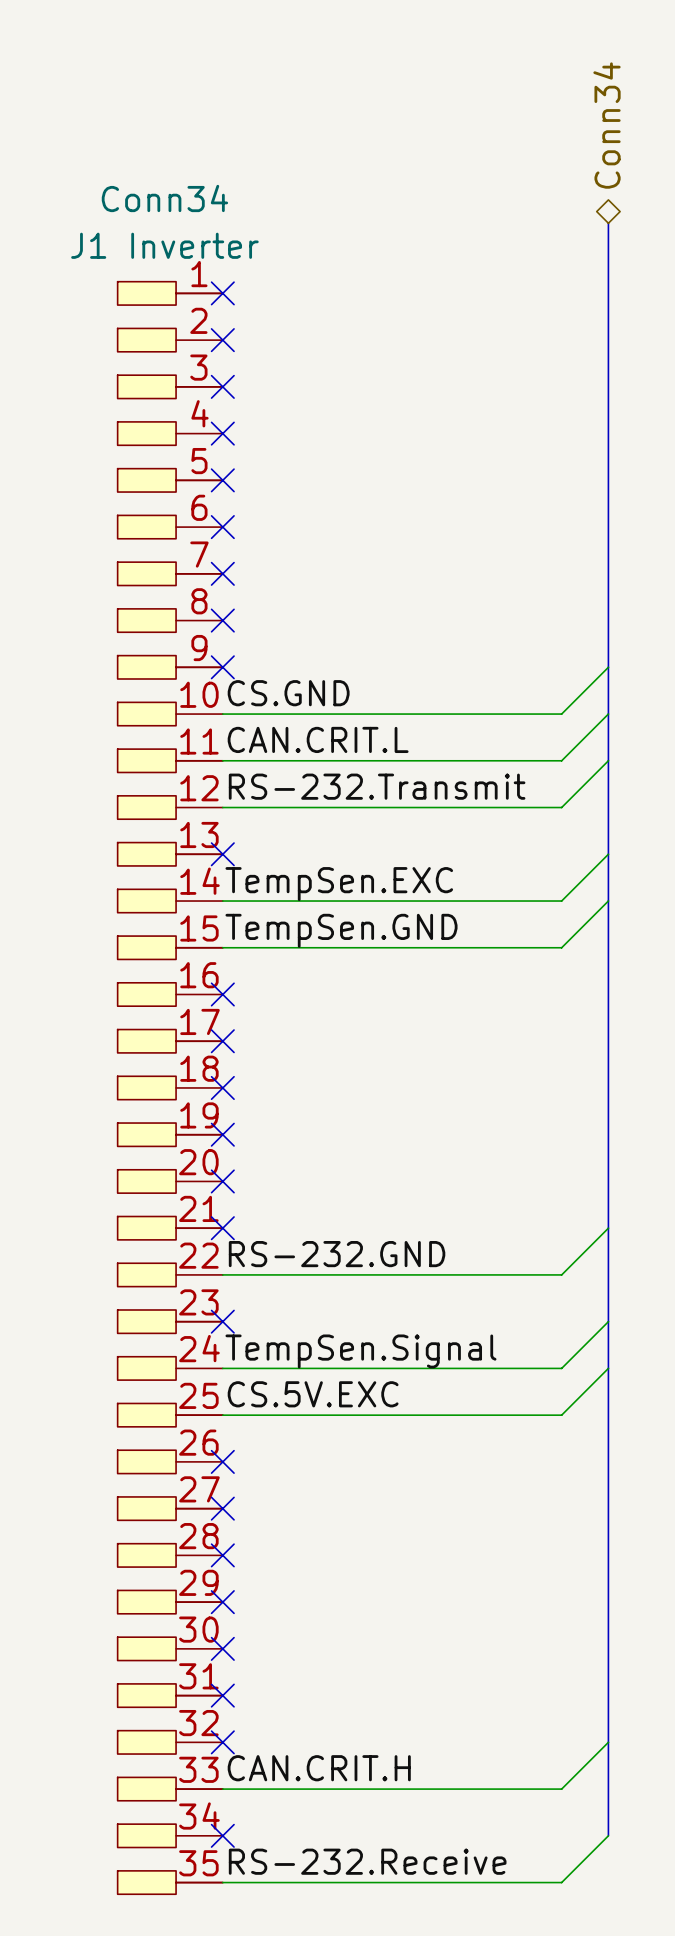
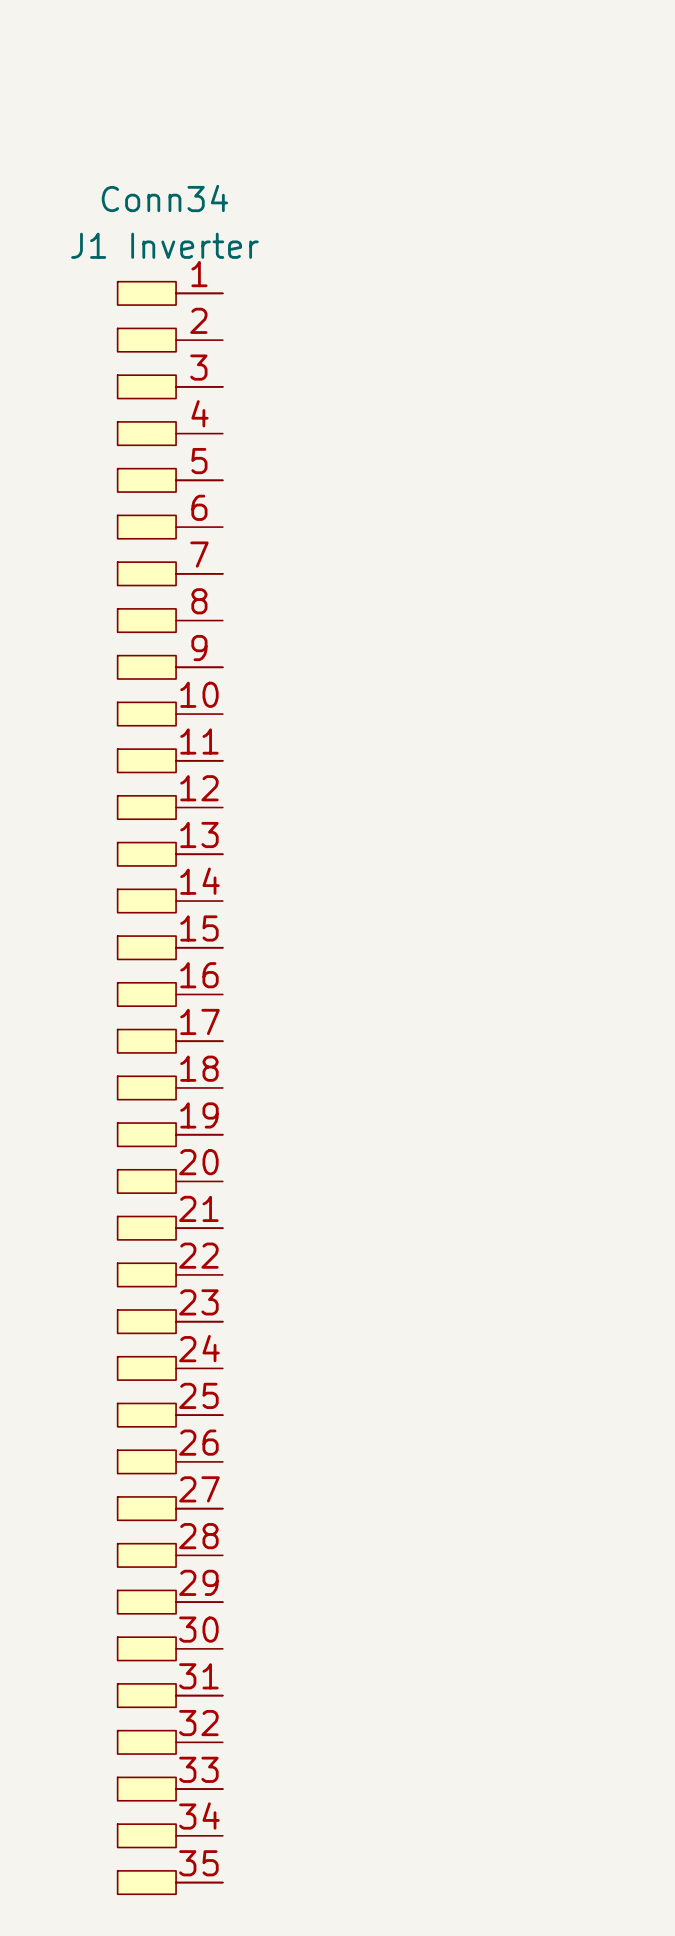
hierarchical label: Conn34 (606, 125) -> none
bus: (608, 223) (608, 1835) -> none
no-connect mark: (222, 293) -> none
no-connect mark: (222, 340) -> none
no-connect mark: (222, 386) -> none
no-connect mark: (222, 433) -> none
no-connect mark: (222, 480) -> none
no-connect mark: (222, 527) -> none
no-connect mark: (222, 573) -> none
no-connect mark: (222, 620) -> none
no-connect mark: (222, 667) -> none
wire: (608, 667) (561, 714) (222, 714) -> none
label: CS.GND (288, 693) -> none
wire: (608, 714) (561, 760) (222, 760) -> none
label: CAN.CRIT.L (318, 739) -> none
wire: (608, 760) (561, 807) (222, 807) -> none
label: RS-232.Transmit (377, 786) -> none
no-connect mark: (222, 854) -> none
wire: (608, 854) (561, 901) (222, 901) -> none
label: TempSen.EXC (339, 884) -> none
wire: (608, 901) (561, 947) (222, 947) -> none
label: TempSen.GND (341, 930) -> none
no-connect mark: (222, 994) -> none
no-connect mark: (222, 1041) -> none
no-connect mark: (222, 1087) -> none
no-connect mark: (222, 1134) -> none
no-connect mark: (222, 1181) -> none
no-connect mark: (222, 1228) -> none
wire: (608, 1228) (561, 1274) (222, 1274) -> none
label: RS-232.GND (337, 1254) -> none
no-connect mark: (222, 1321) -> none
wire: (608, 1321) (561, 1368) (222, 1368) -> none
label: TempSen.Signal (360, 1351) -> none
wire: (608, 1368) (561, 1415) (222, 1415) -> none
label: CS.5V.EXC (313, 1394) -> none
no-connect mark: (222, 1461) -> none
no-connect mark: (222, 1508) -> none
no-connect mark: (222, 1555) -> none
no-connect mark: (222, 1602) -> none
no-connect mark: (222, 1648) -> none
no-connect mark: (222, 1695) -> none
no-connect mark: (222, 1742) -> none
wire: (608, 1742) (561, 1789) (222, 1789) -> none
label: CAN.CRIT.H (319, 1768) -> none
no-connect mark: (222, 1835) -> none
wire: (608, 1835) (561, 1882) (222, 1882) -> none
label: RS-232.Receive (367, 1861) -> none

